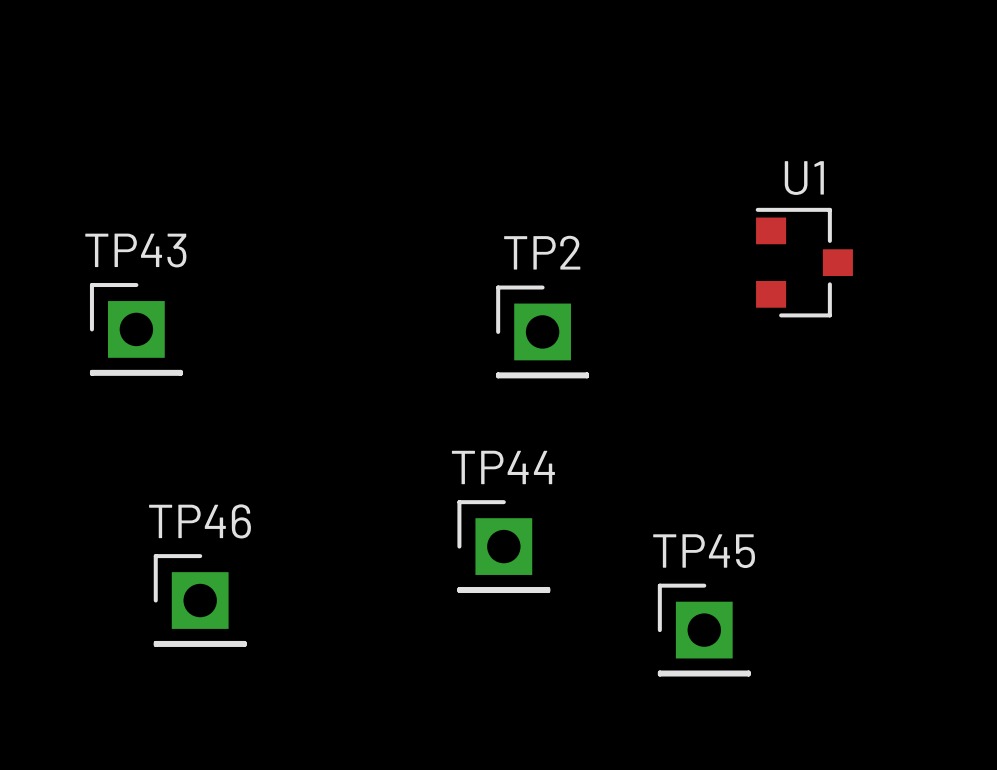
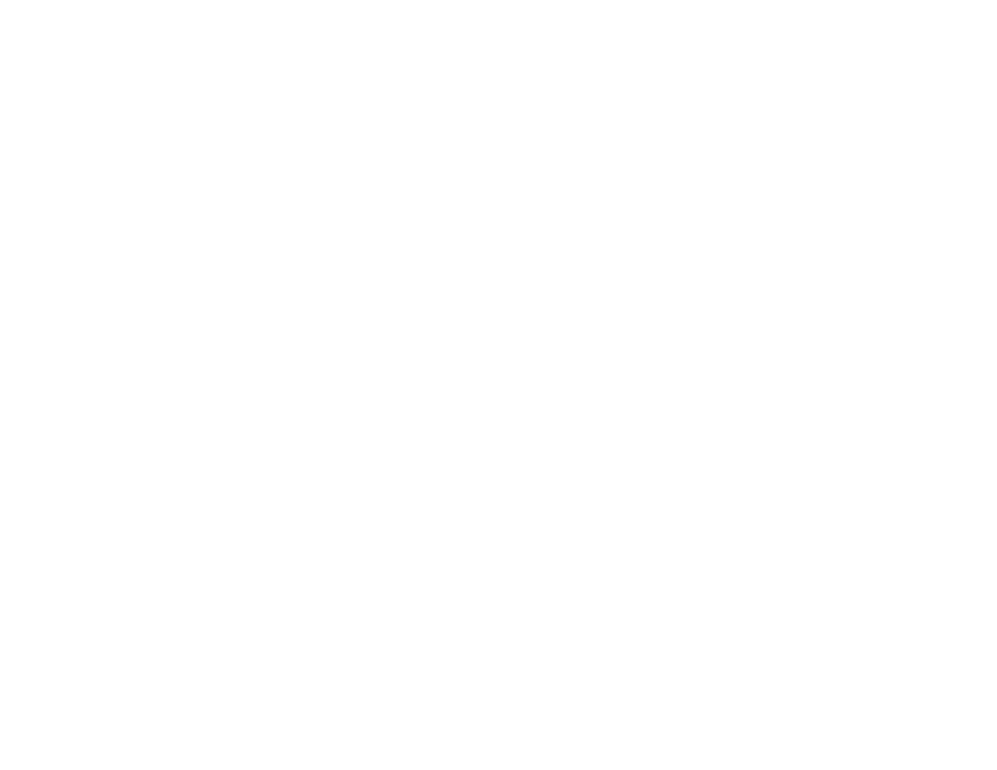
U1: (804, 262) -> none
TP43: (136, 329) -> none
TP2: (542, 331) -> none
TP44: (503, 546) -> none
TP46: (200, 600) -> none
TP45: (704, 630) -> none

